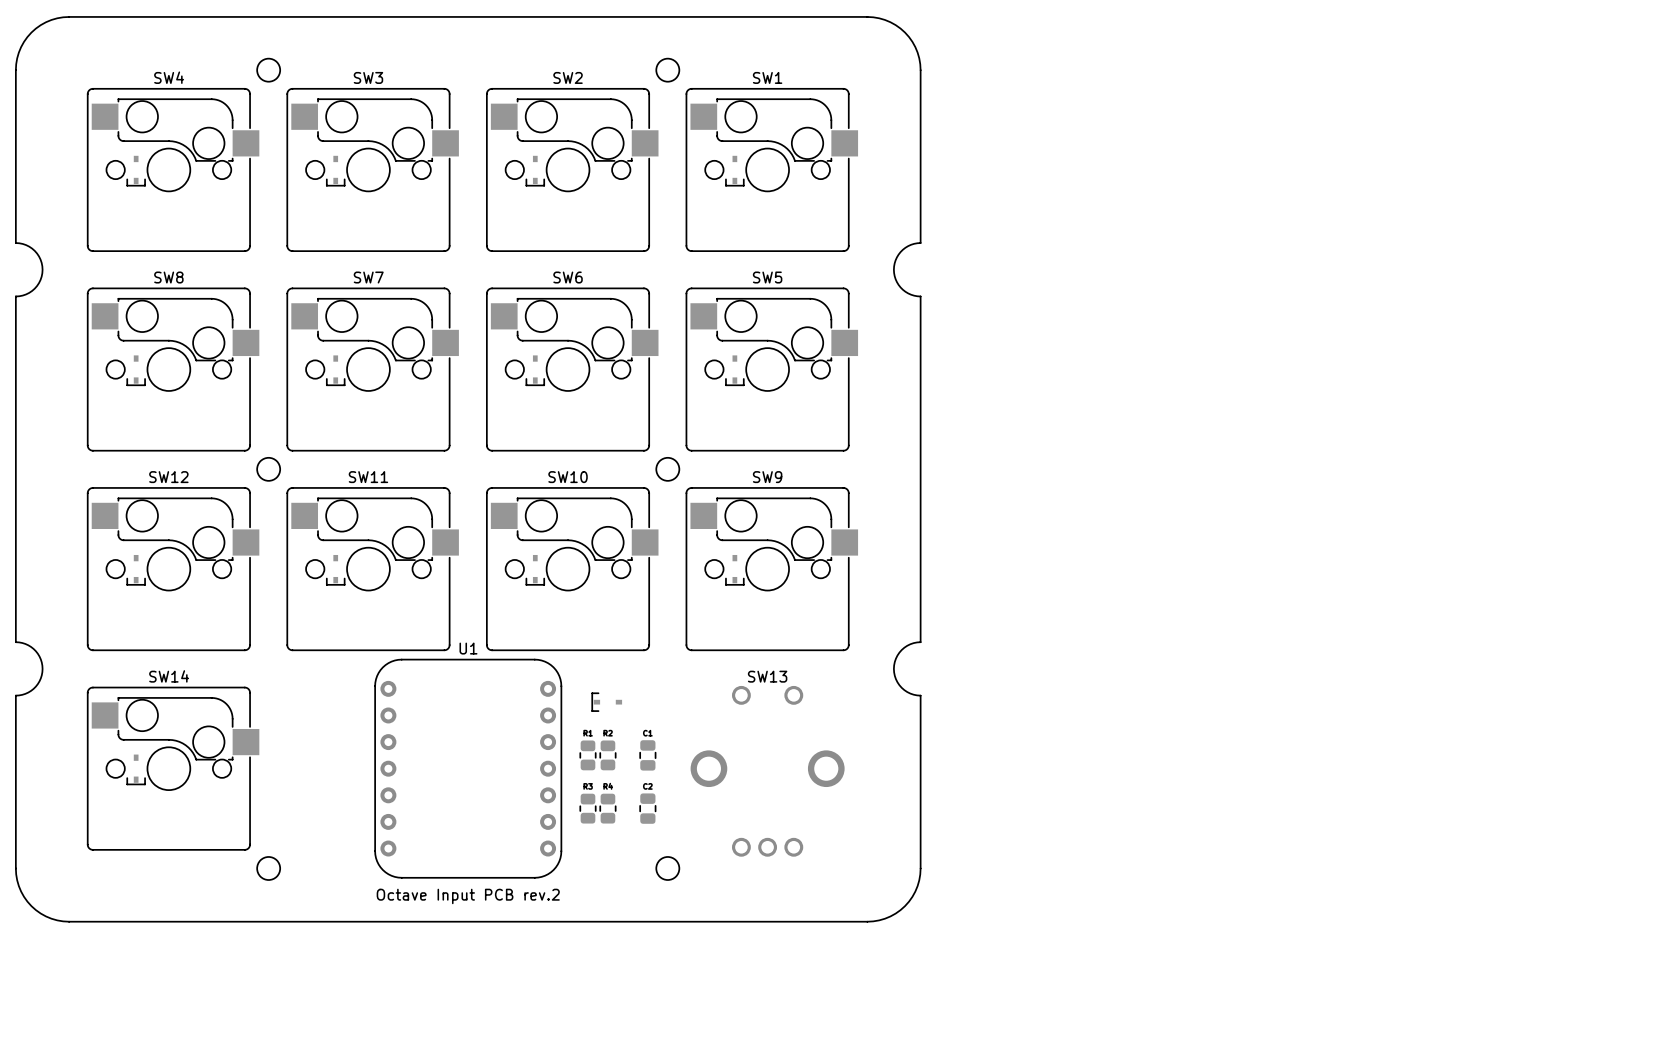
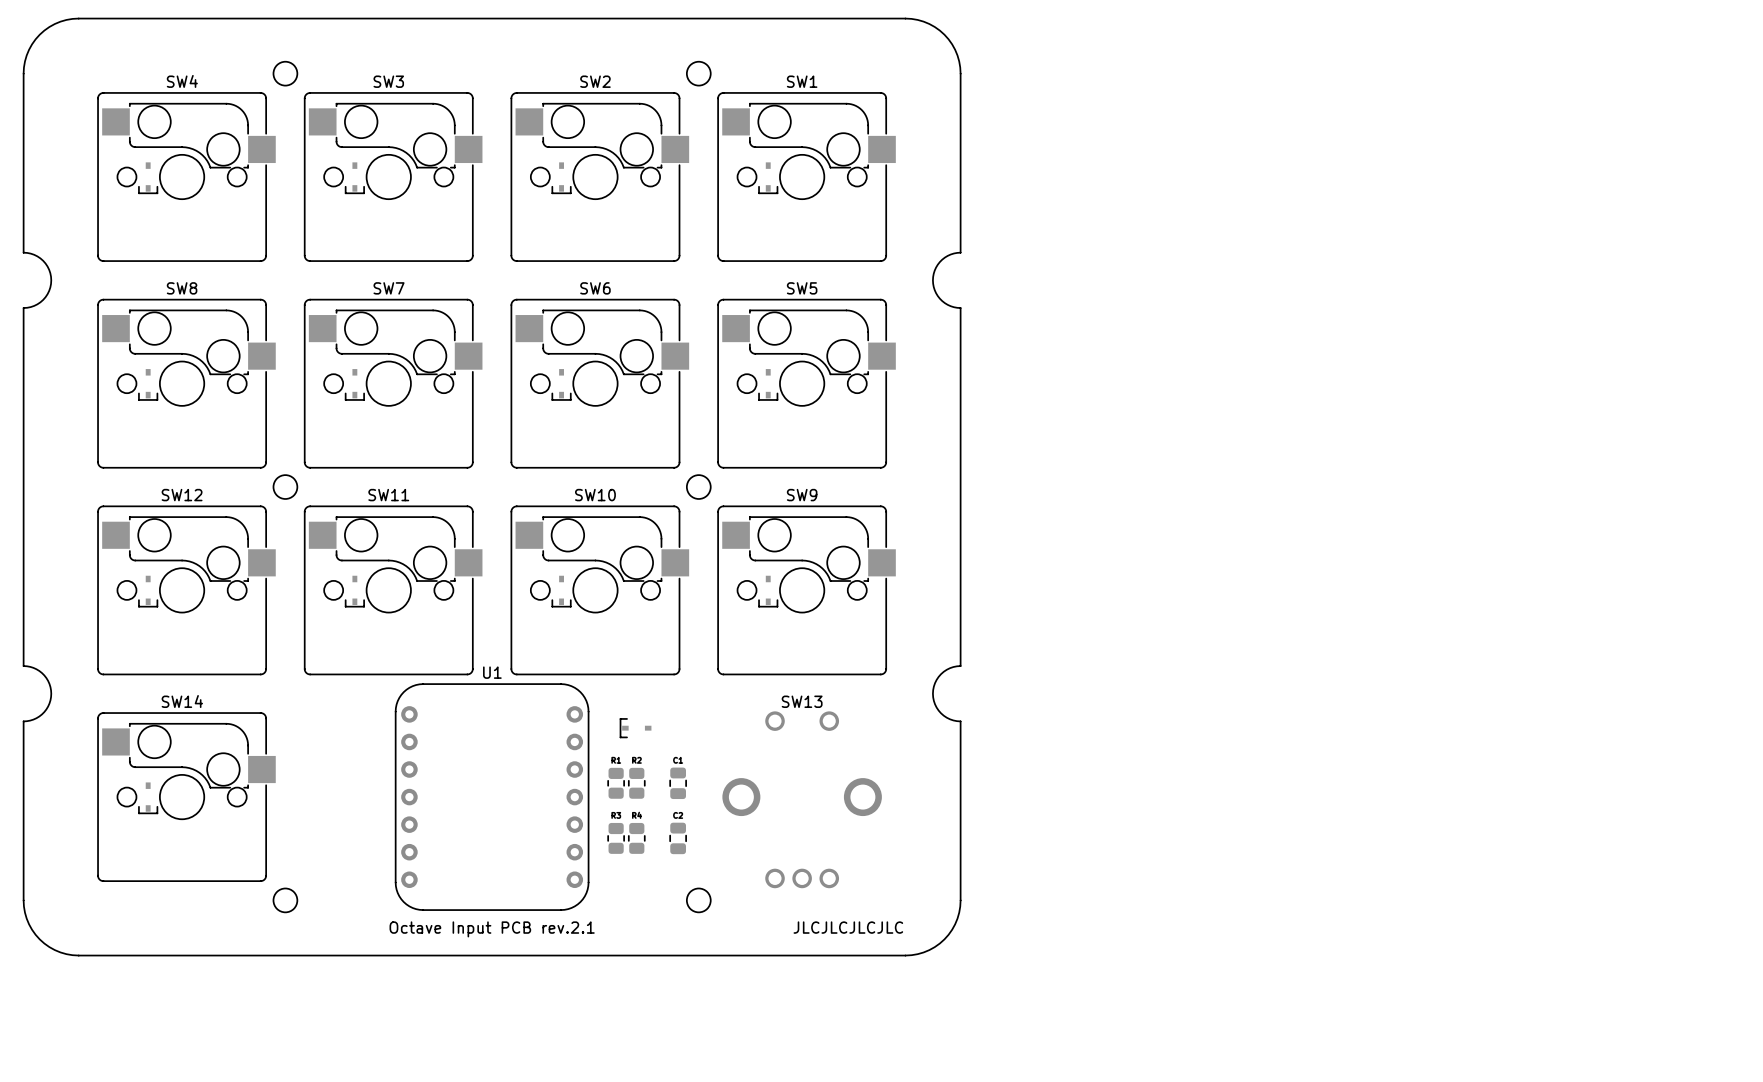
text: none -> JLCJLCJLCJLC (848, 927)
text: Octave Input PCB rev.2 (468, 896) -> Octave Input PCB rev.2.1 (492, 929)

